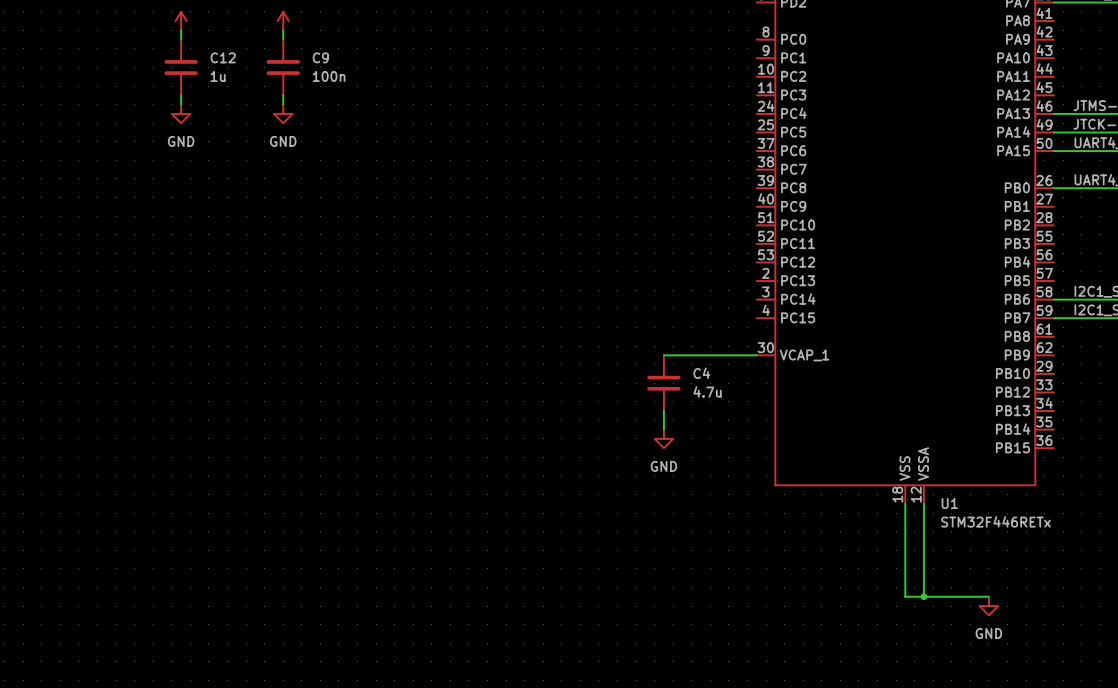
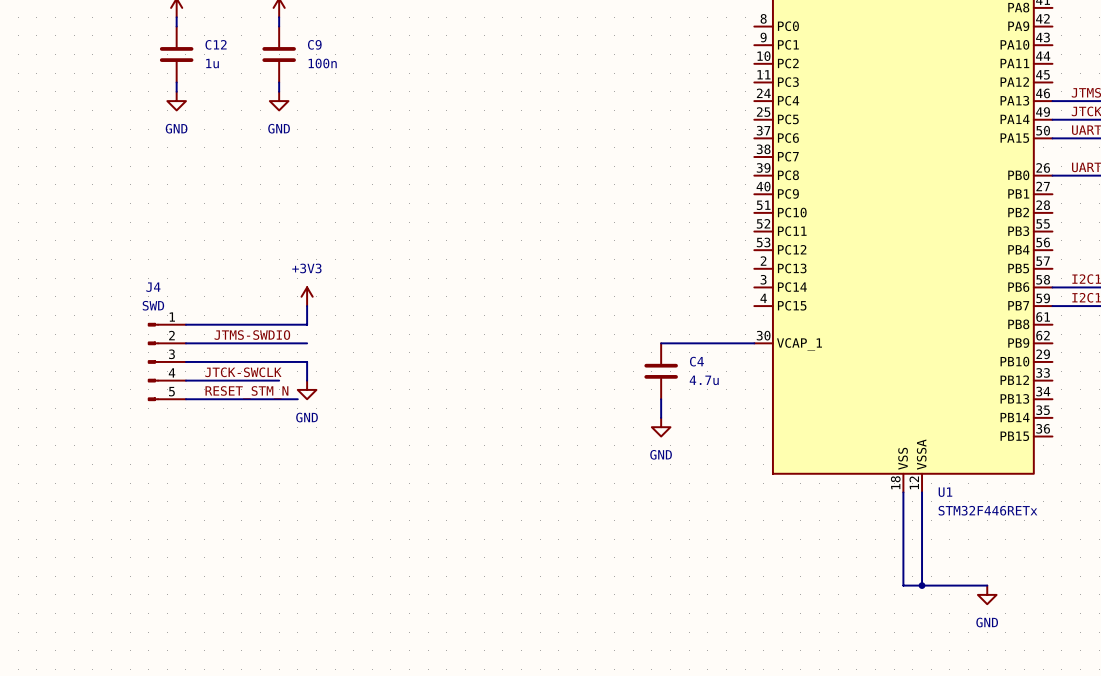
power symbol: none -> +3V3 (307, 296)
wire: none -> (307, 306) (307, 324) (185, 324)
label: none -> JTMS-SWDIO (252, 335)
wire: none -> (185, 343) (307, 343)
J4: none -> SWD (167, 361)
wire: none -> (185, 361) (307, 361) (307, 380)
label: none -> JTCK-SWCLK (243, 372)
wire: none -> (185, 380) (279, 380)
power symbol: none -> GND (307, 389)
label: none -> RESET_STM_N (246, 392)
wire: none -> (185, 399) (297, 399)

